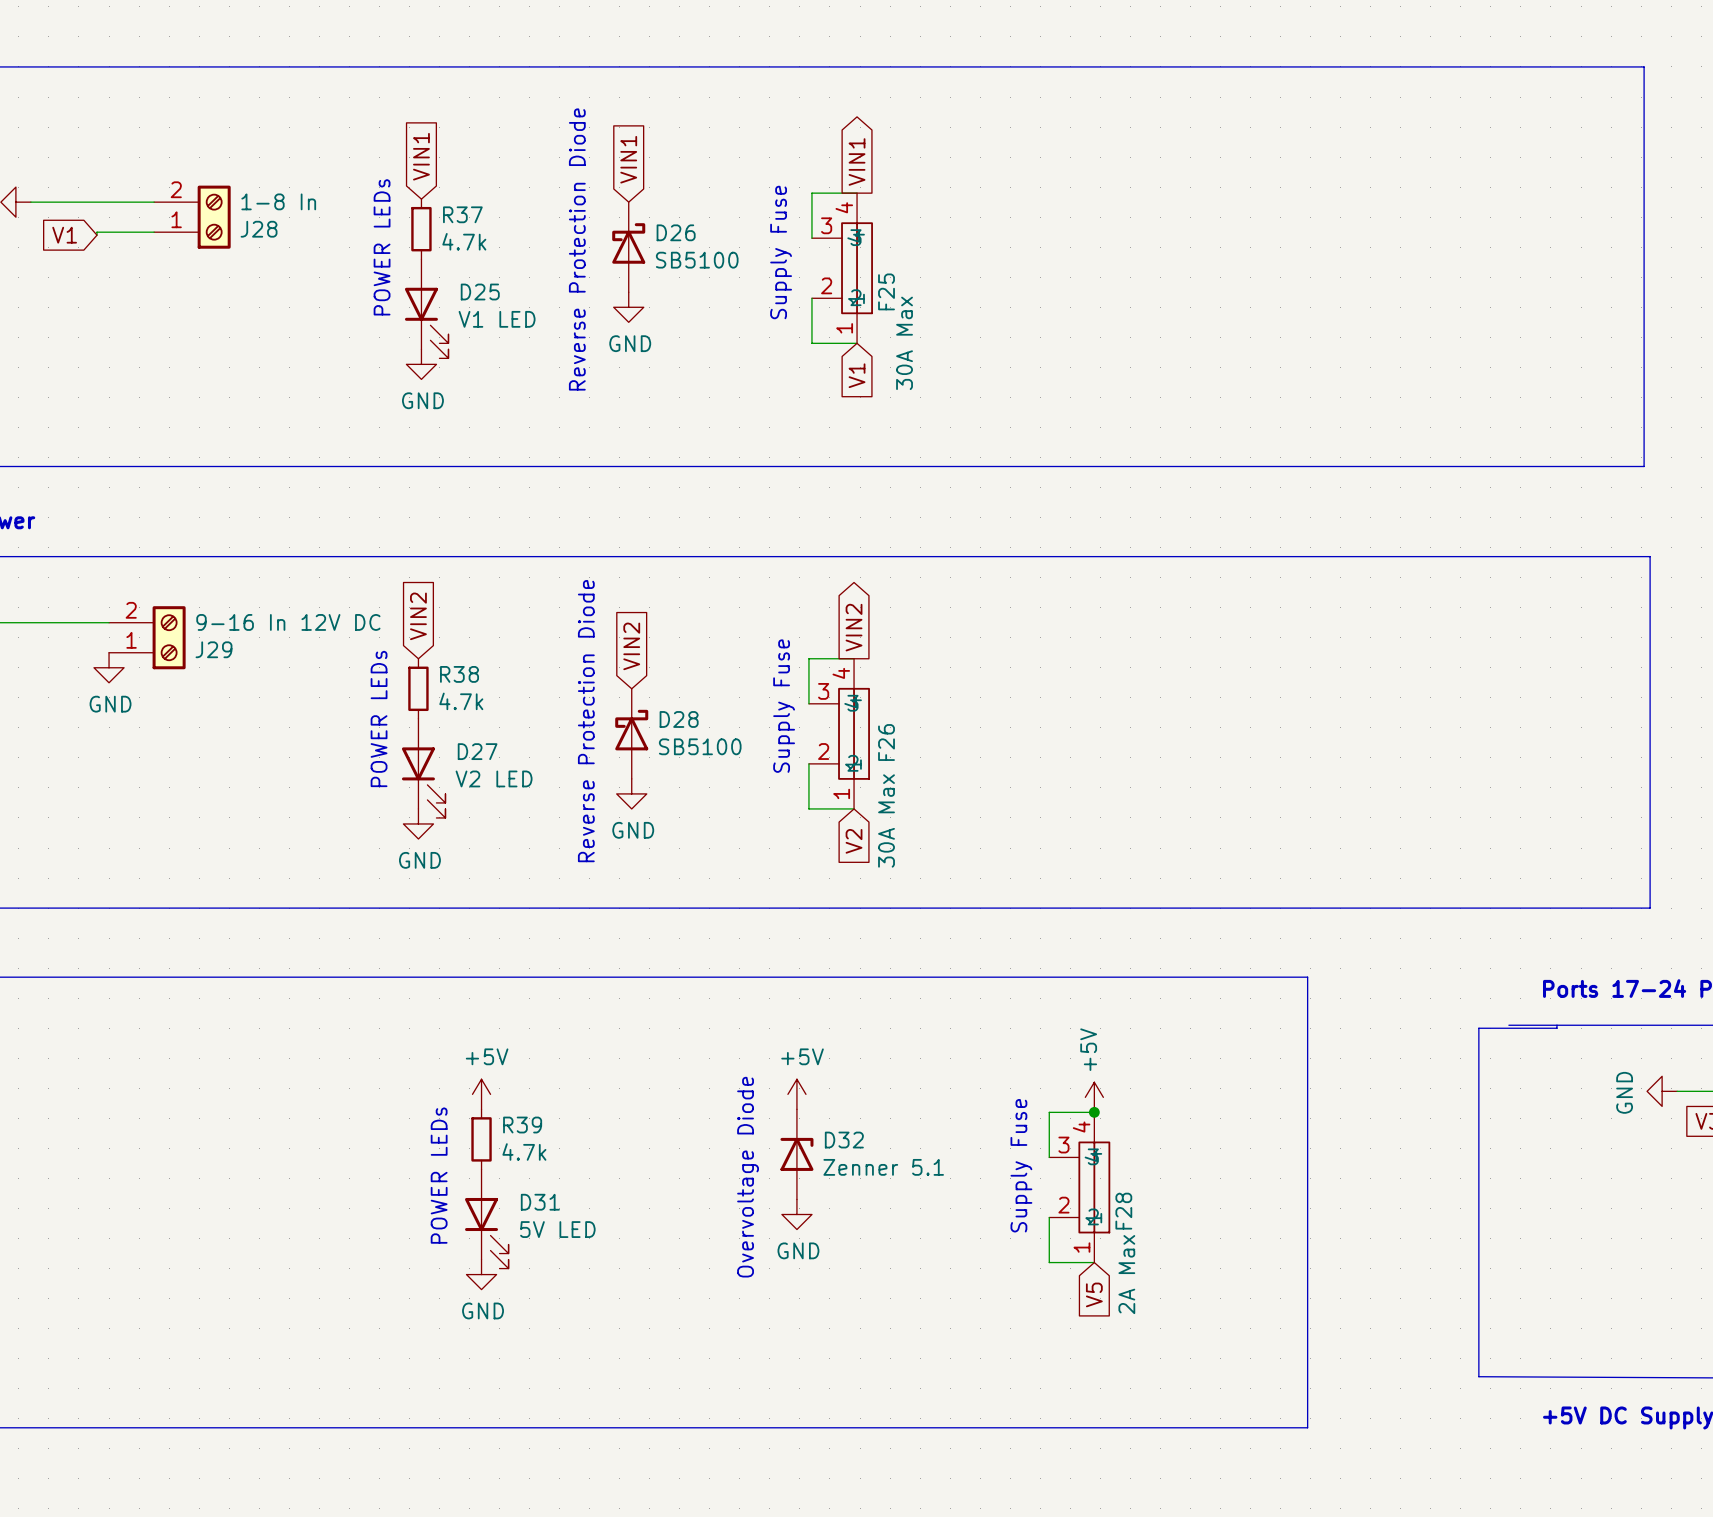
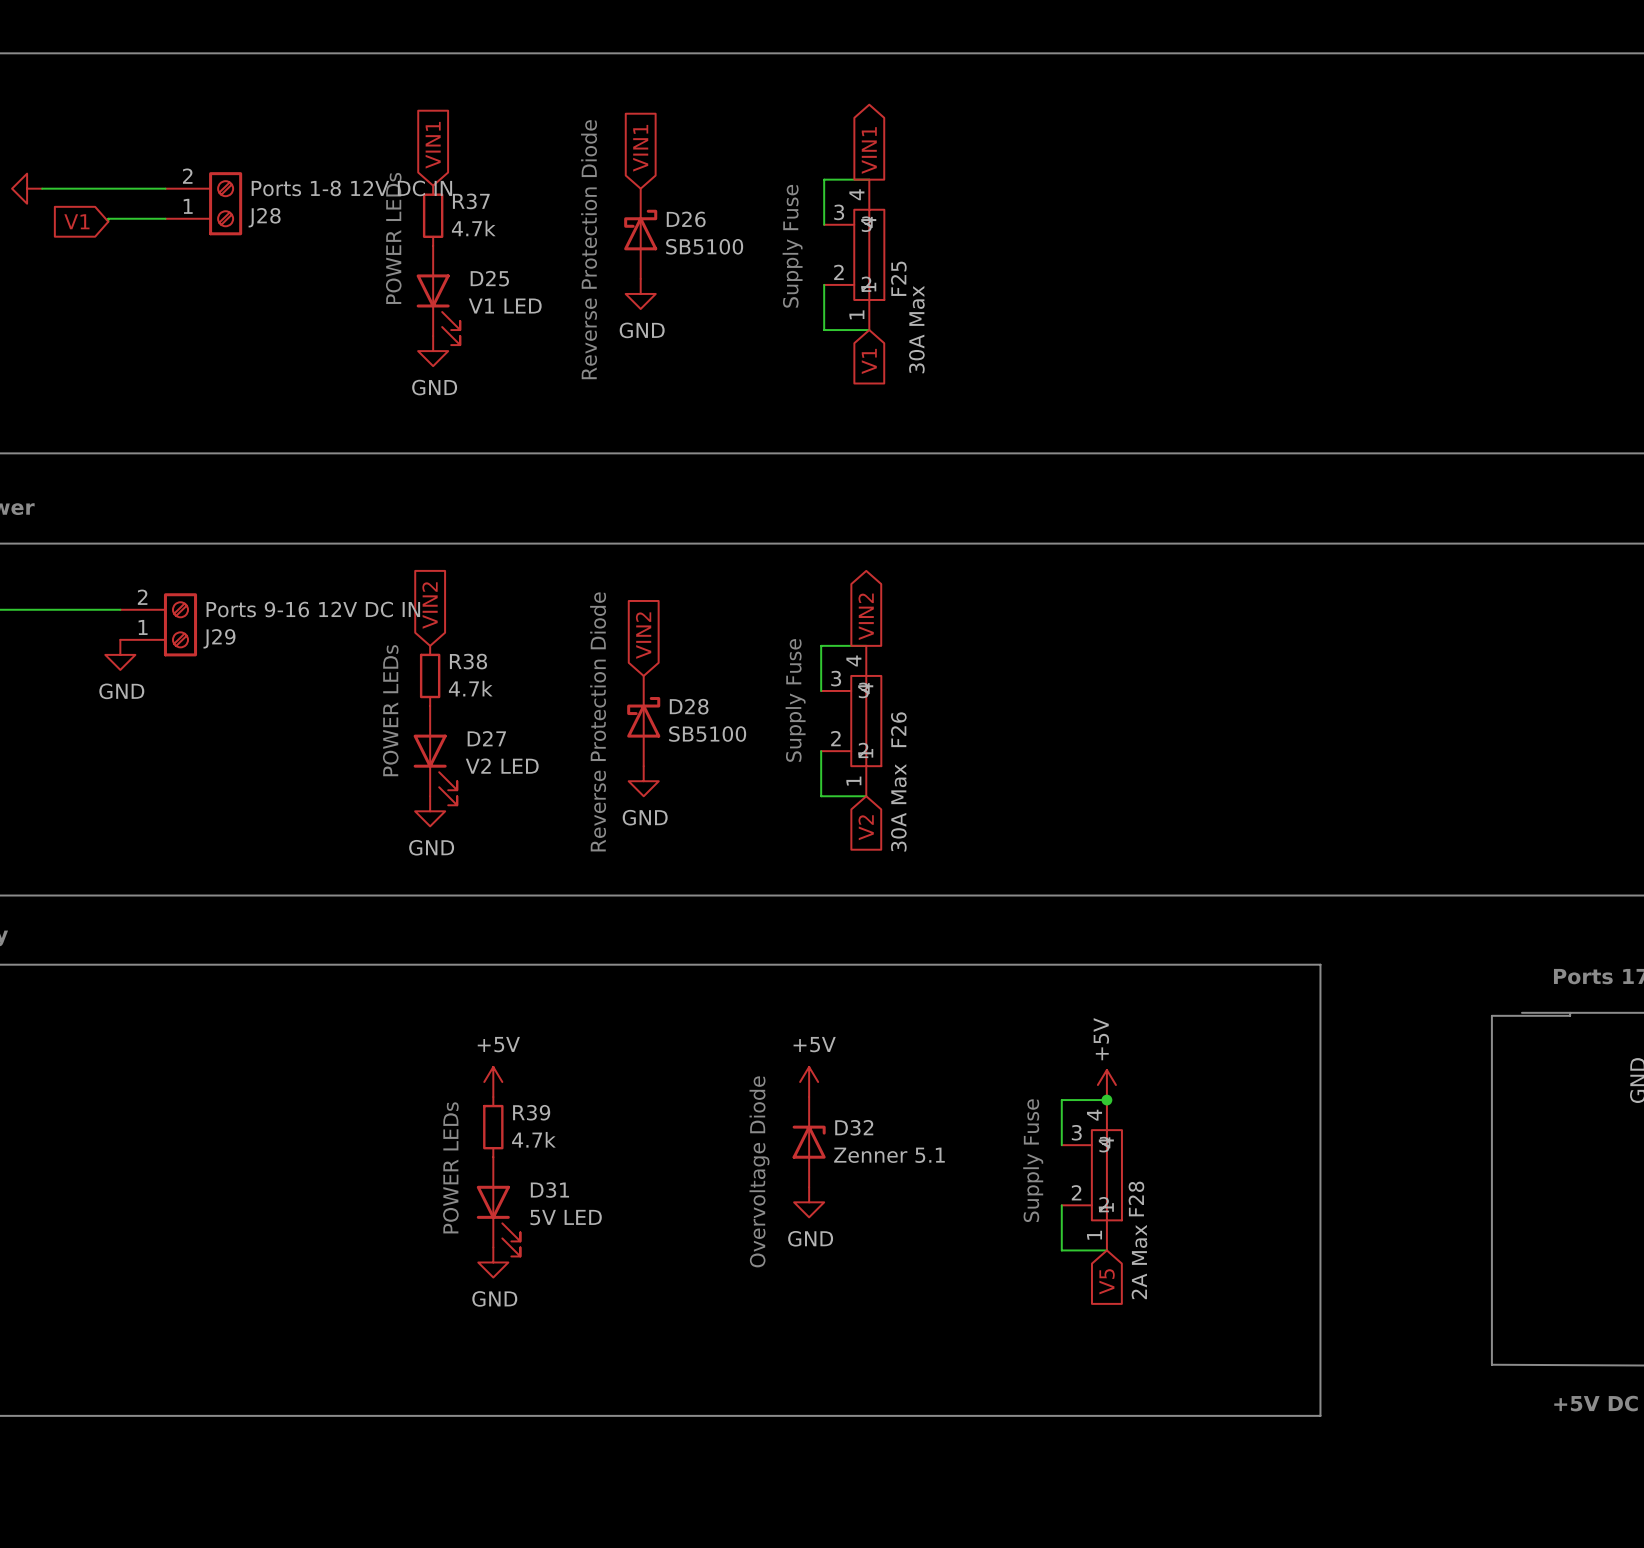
J28 value: 1-8 In (278, 201) -> Ports 1-8 12V DC IN (351, 188)
J29 value: 9-16 In 12V DC (288, 622) -> Ports 9-16 12V DC IN (313, 609)

